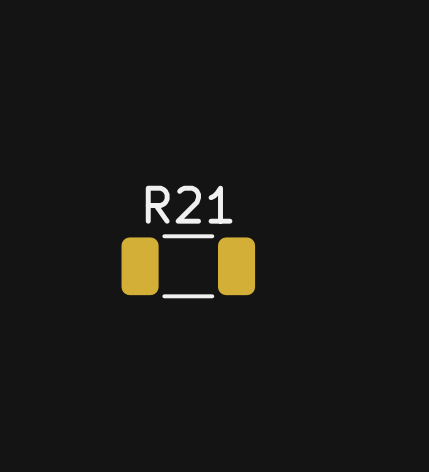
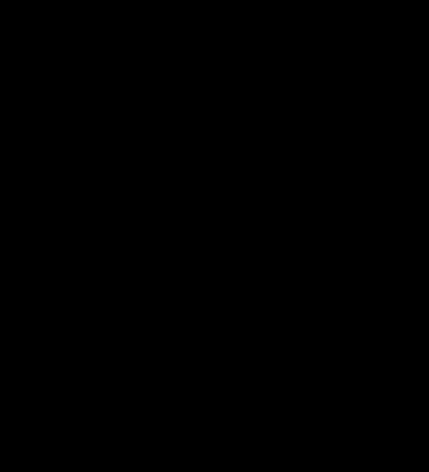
R21: (188, 266) -> none

